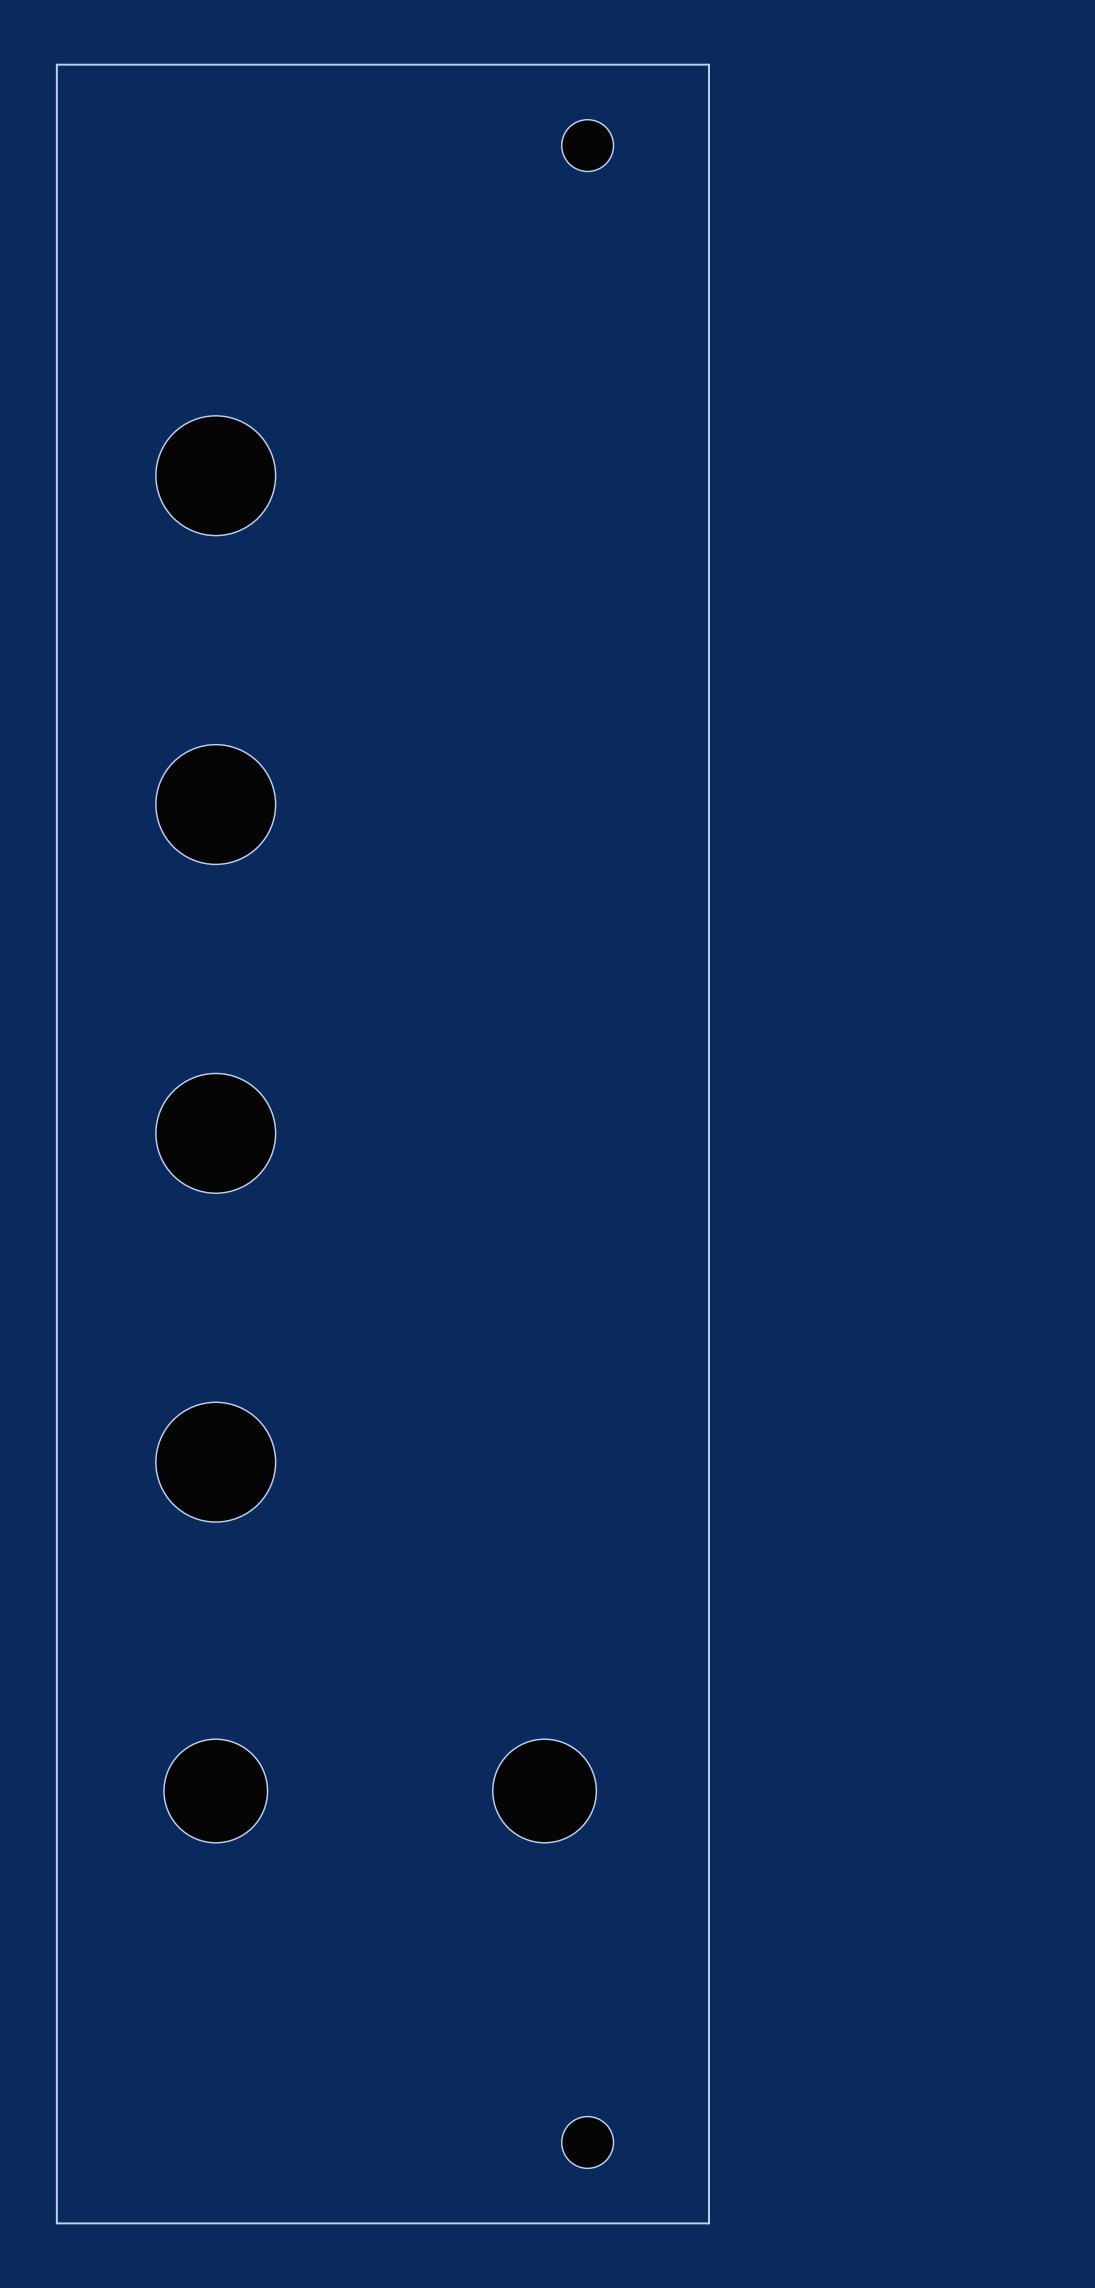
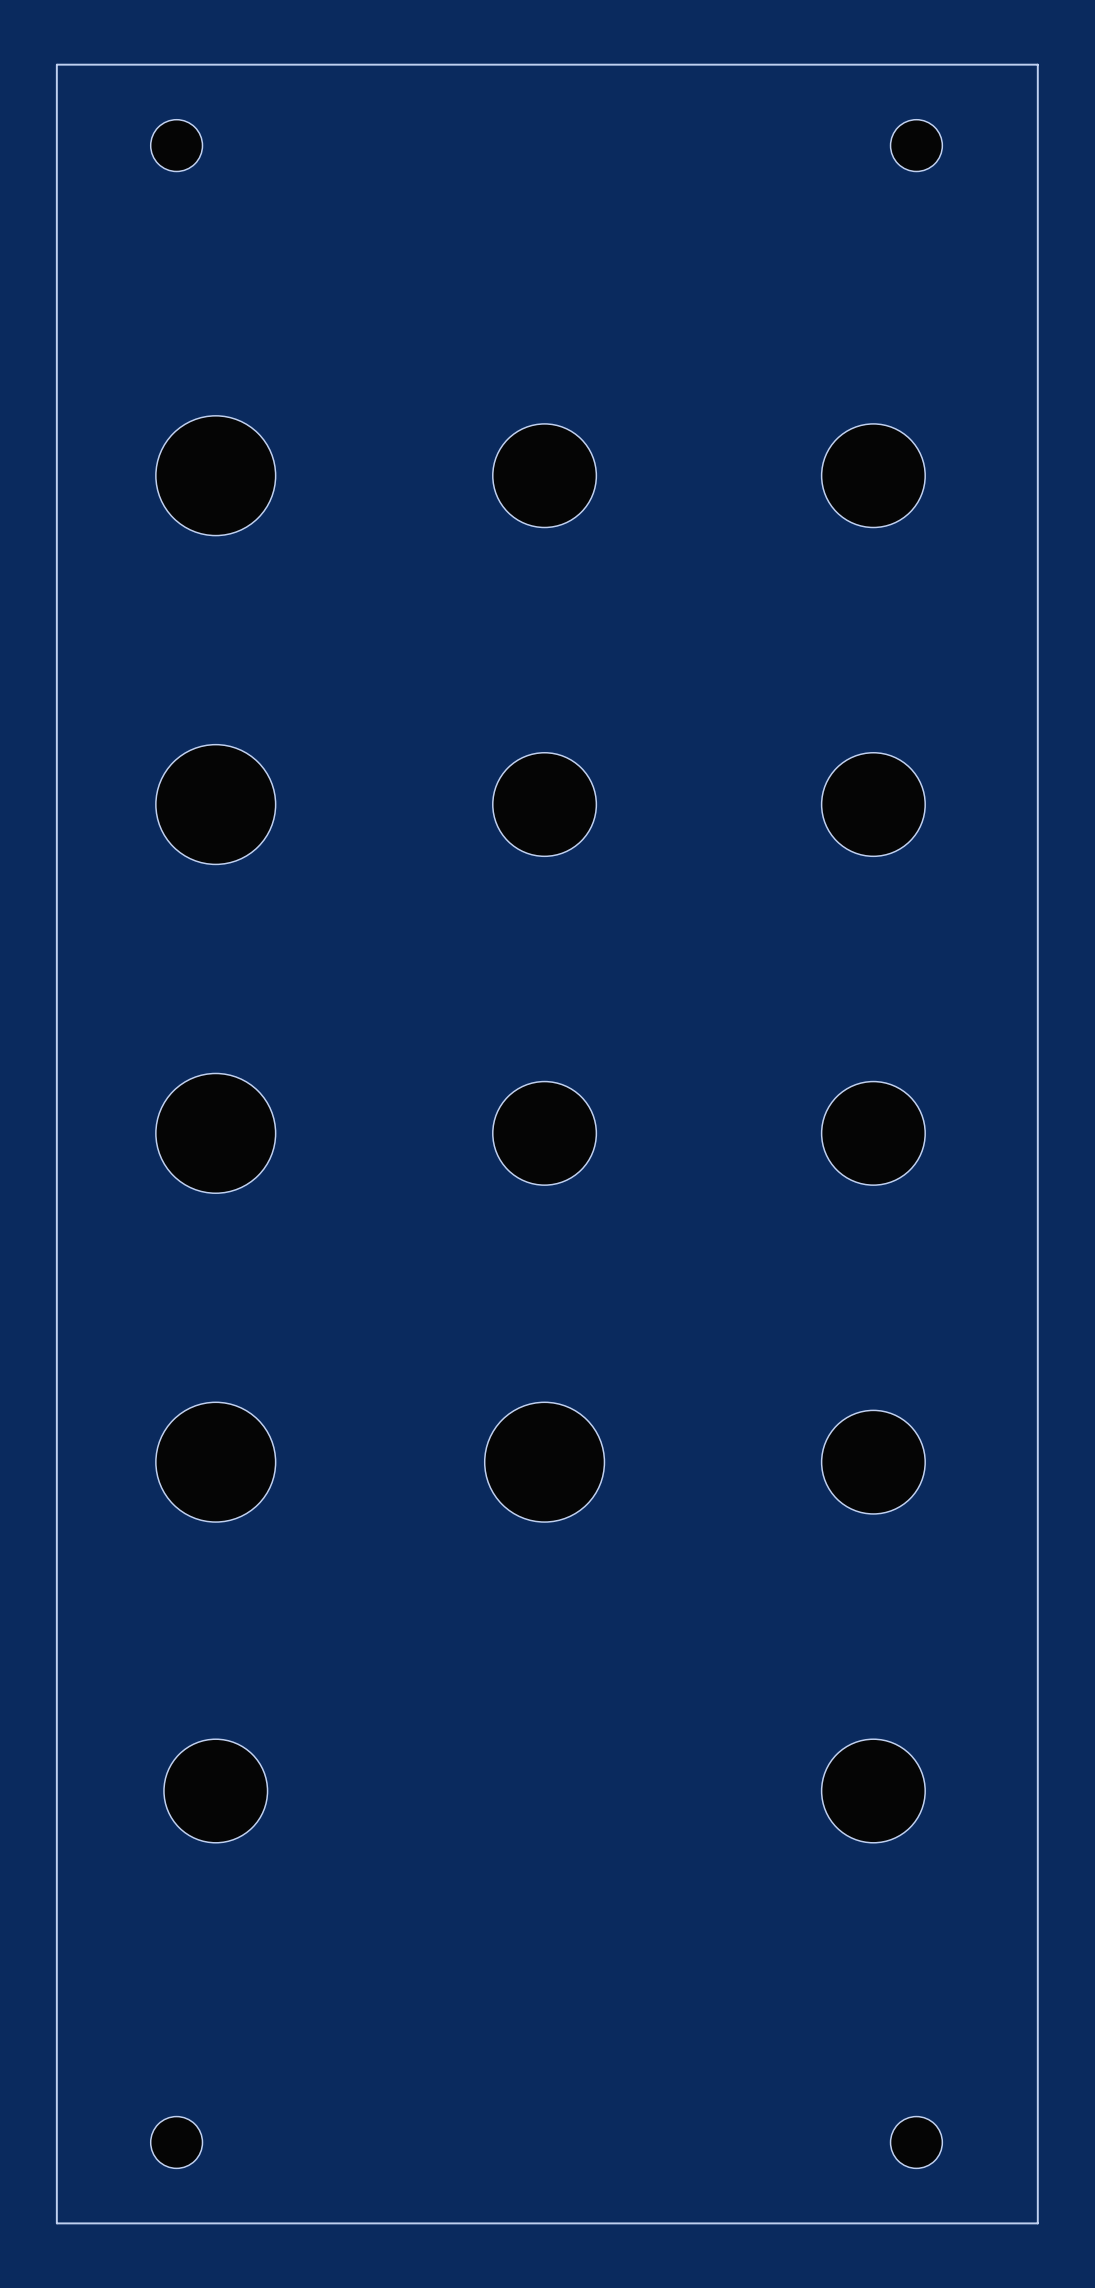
board edge: (708, 64) (708, 2223) -> (708, 64) (1037, 64) (1037, 2223) (708, 2223)
part: none -> (176, 145)
part: (587, 145) -> none
part: none -> (916, 145)
part: none -> (544, 475)
part: none -> (873, 475)
part: none -> (544, 804)
part: none -> (873, 804)
part: none -> (544, 1133)
part: none -> (873, 1133)
part: none -> (544, 1462)
part: none -> (873, 1462)
part: (544, 1791) -> none
part: none -> (873, 1791)
part: none -> (176, 2142)
part: (587, 2142) -> none
part: none -> (916, 2142)

